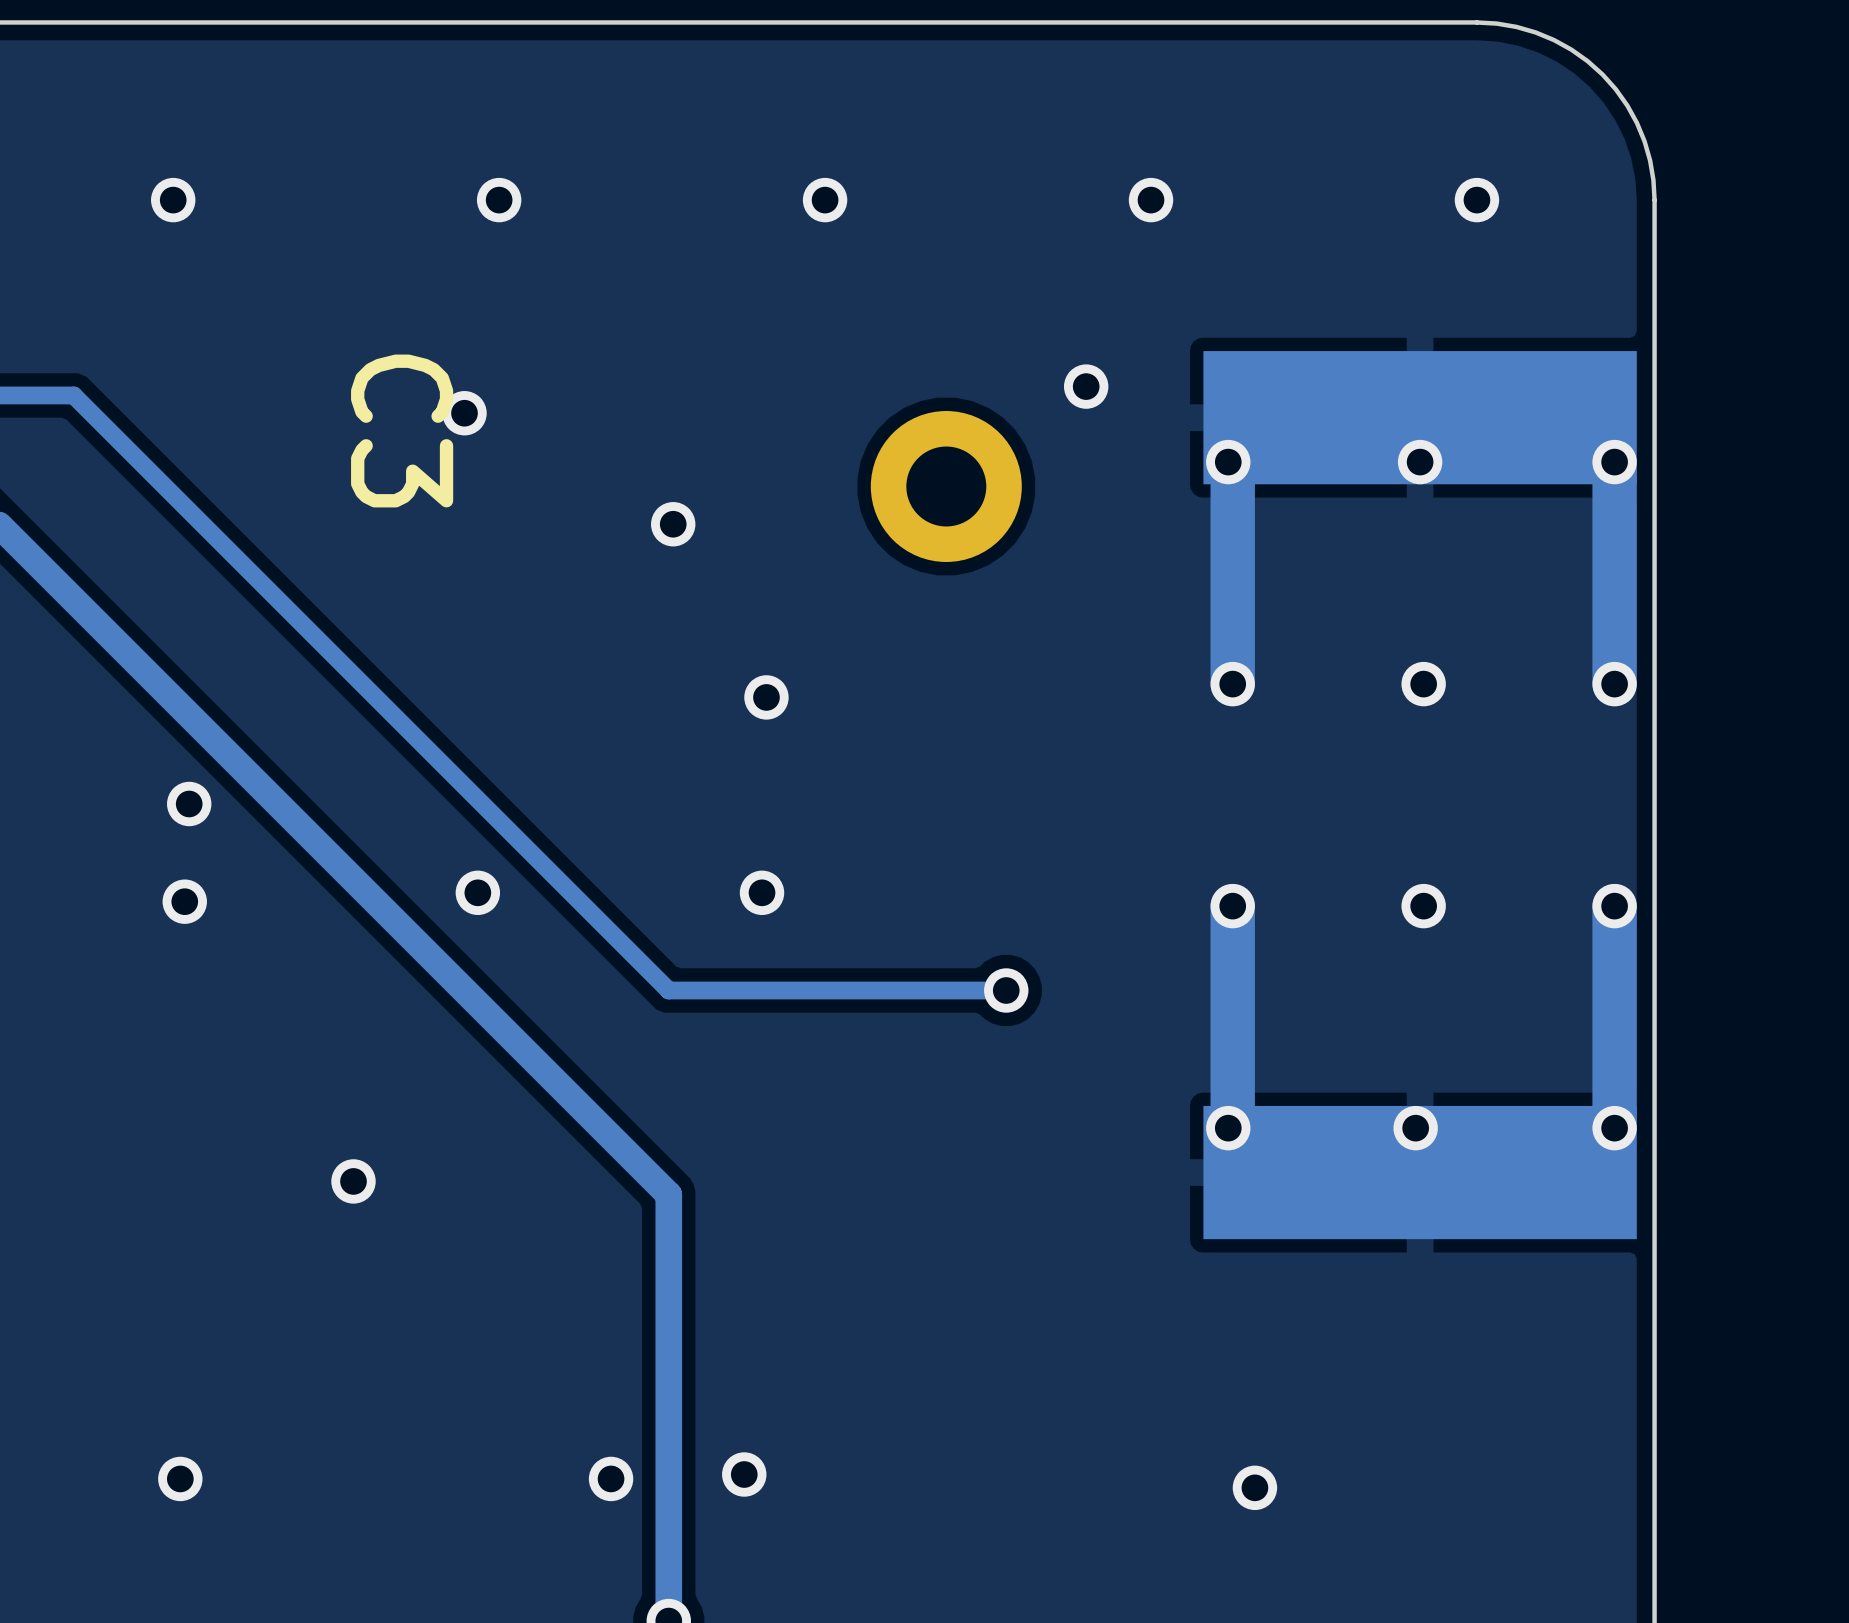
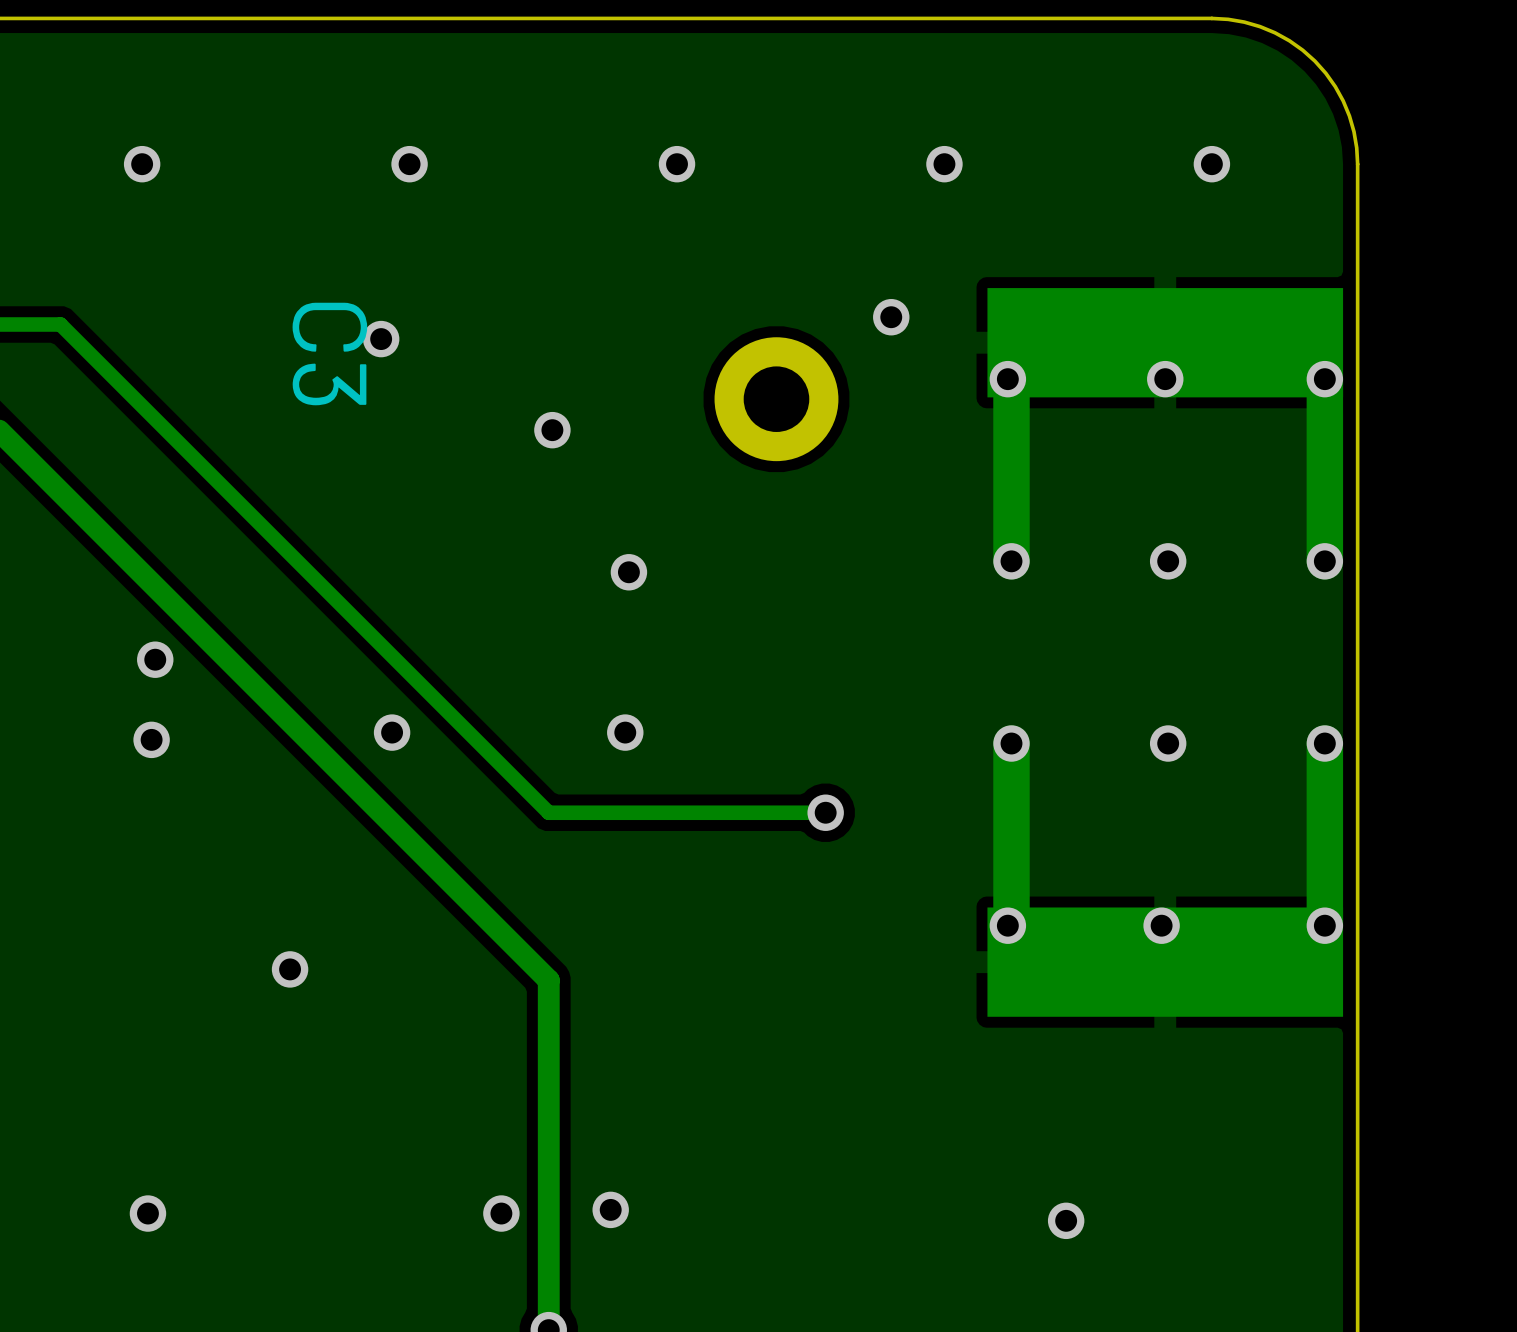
via position: (1254, 1487) -> (1066, 1220)

